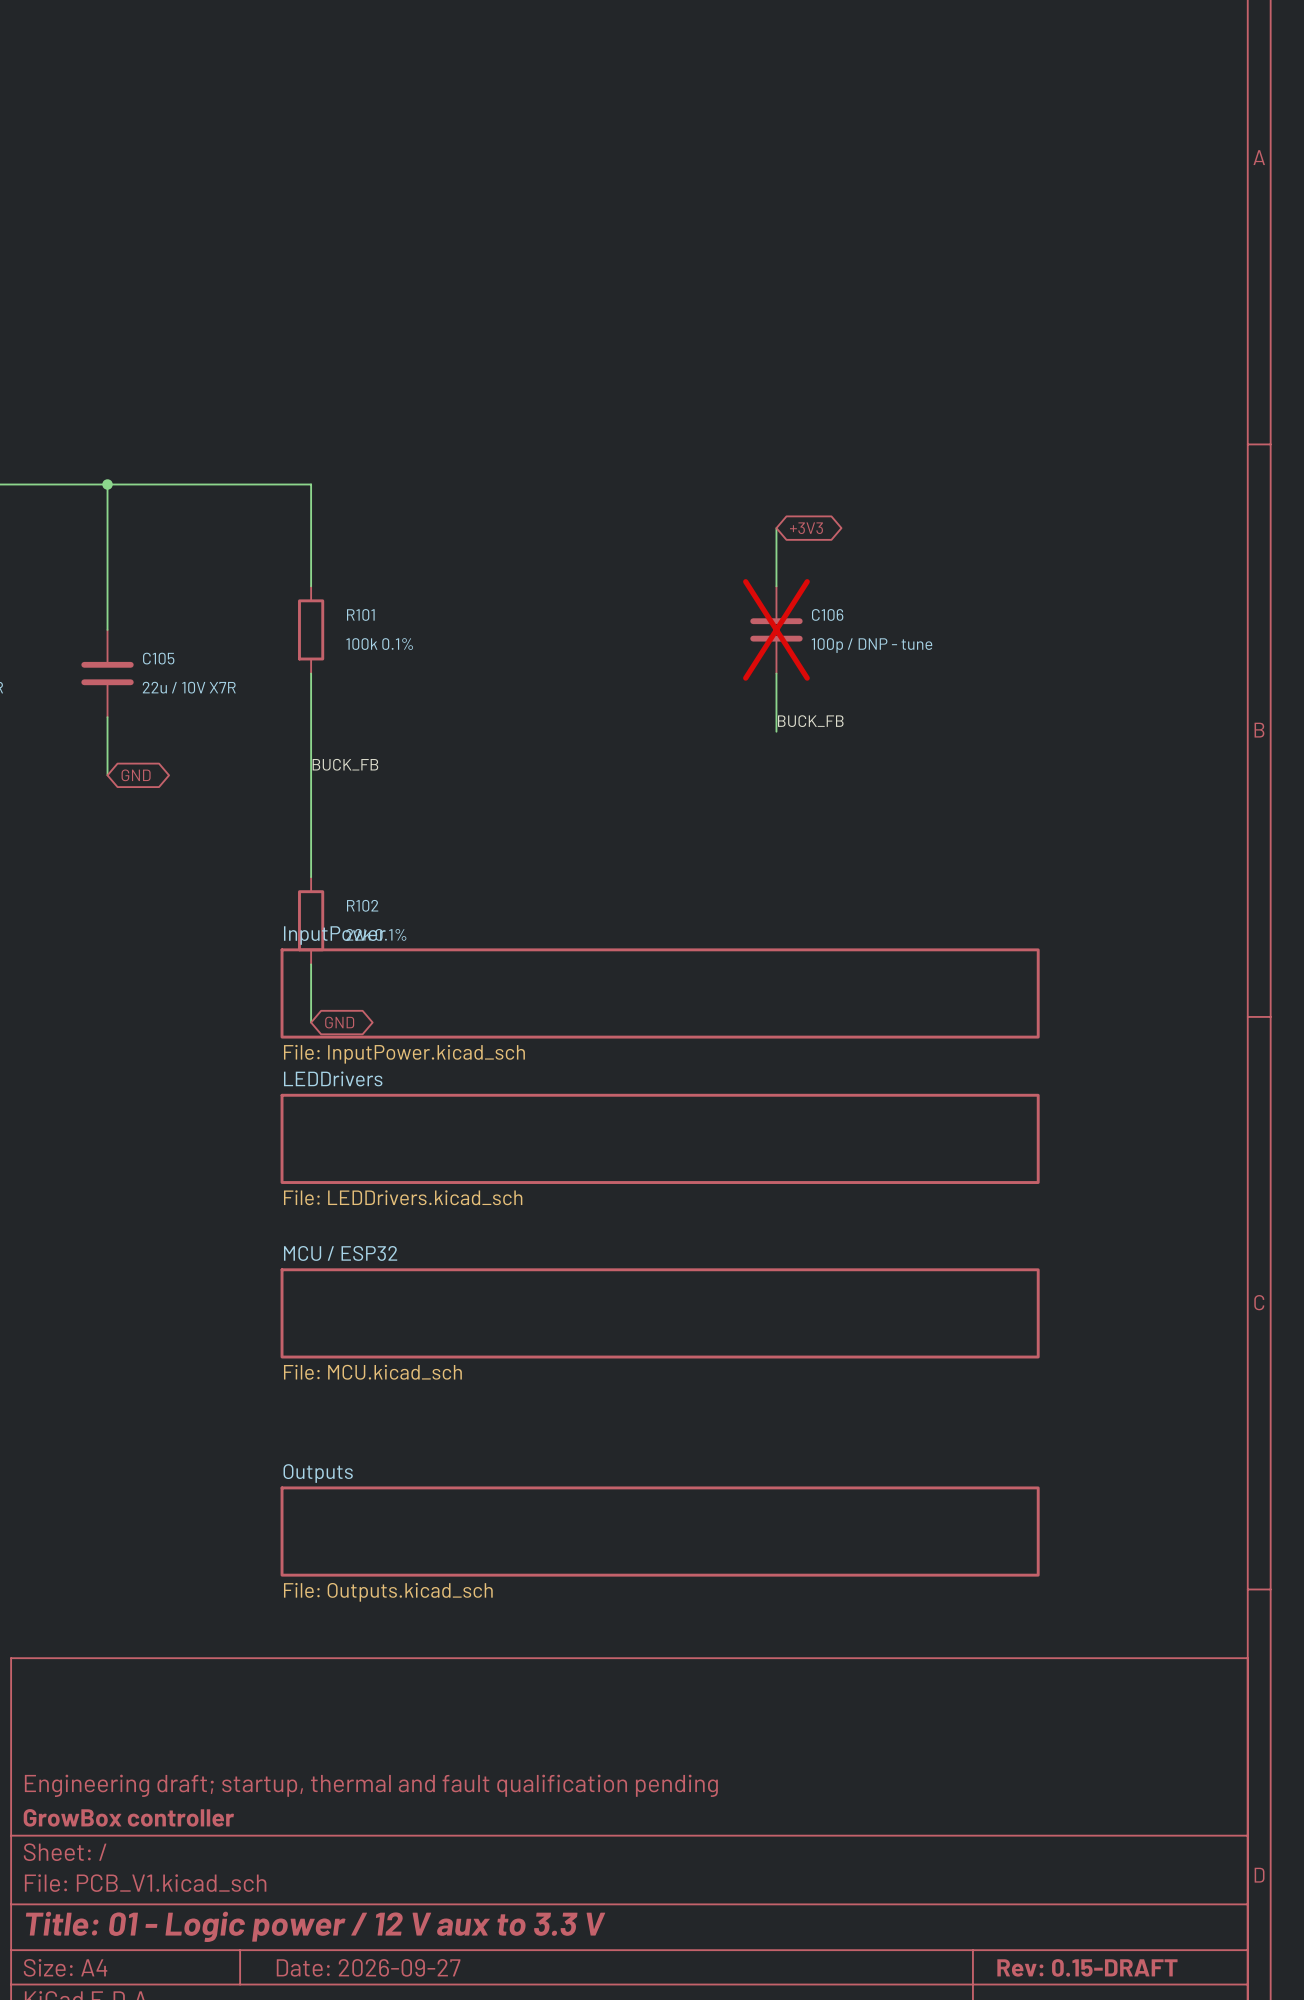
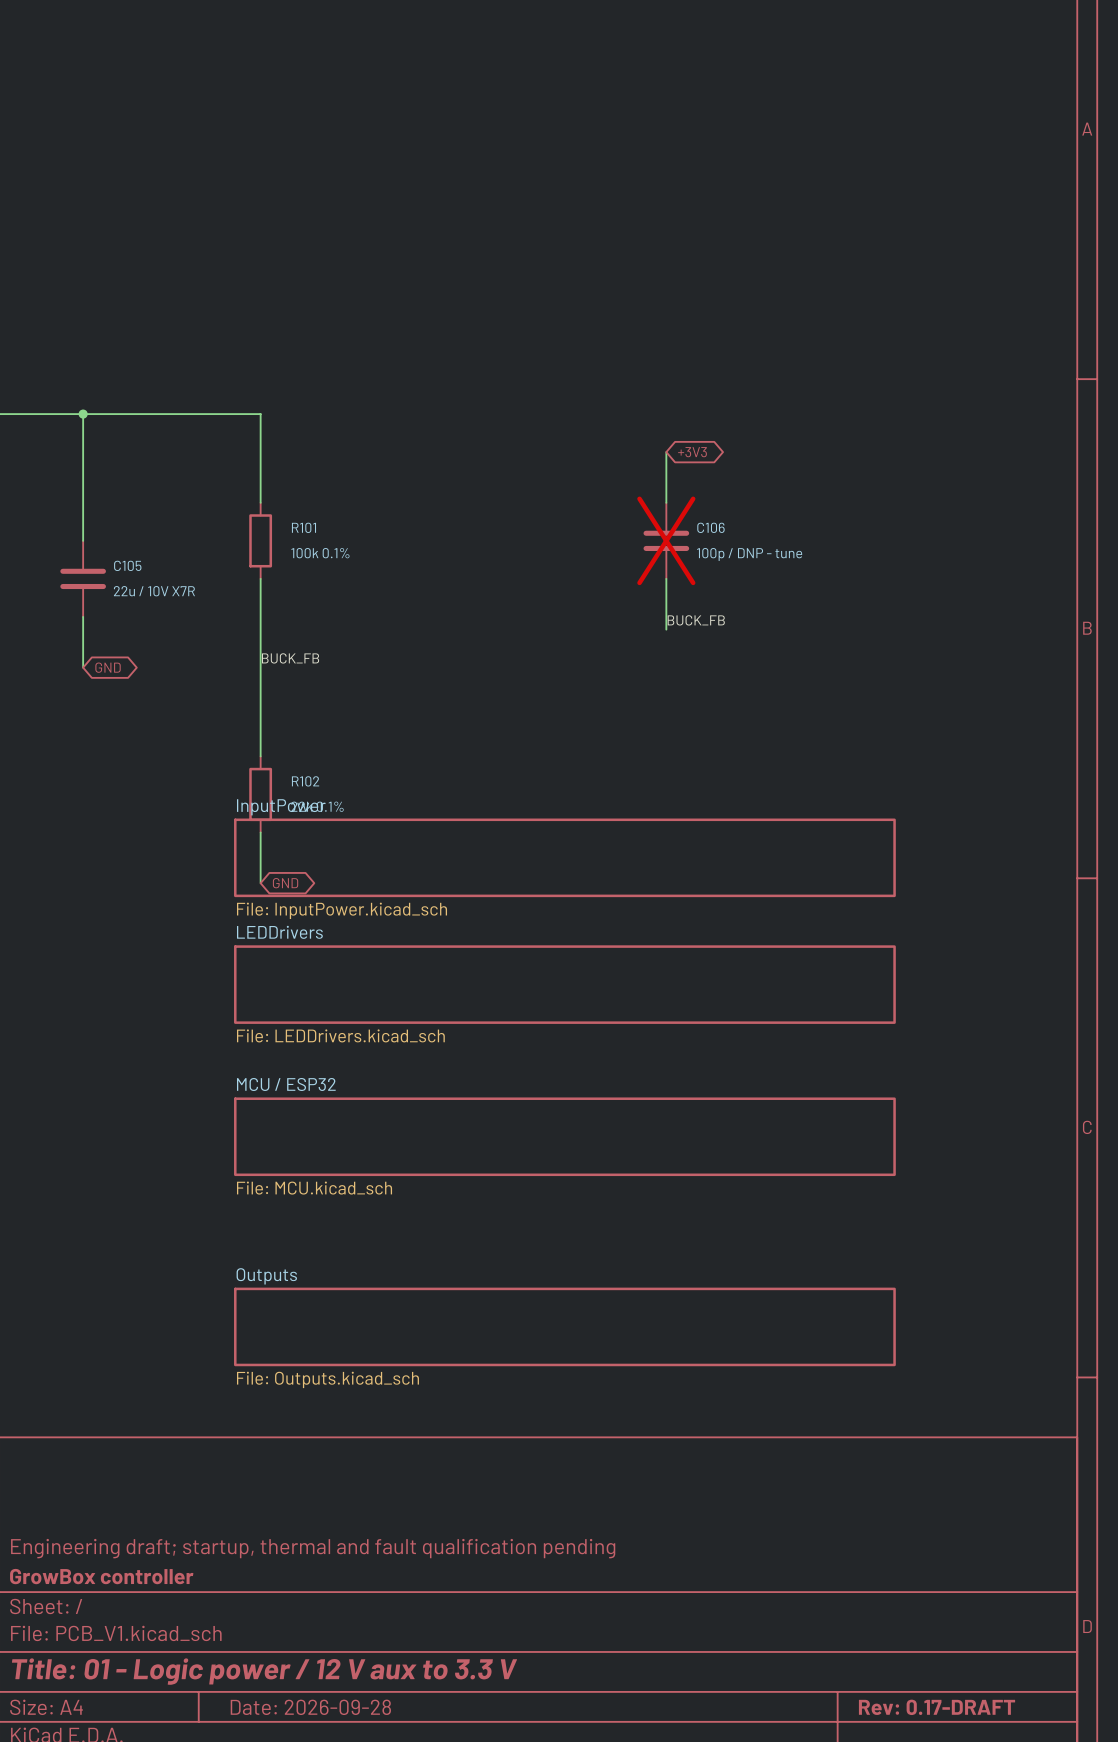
title block: Date: 2026-09-27 (368, 1967) -> Date: 2026-09-28 (310, 1707)
title block: Rev: 0.15-DRAFT (1087, 1967) -> Rev: 0.17-DRAFT (937, 1707)

